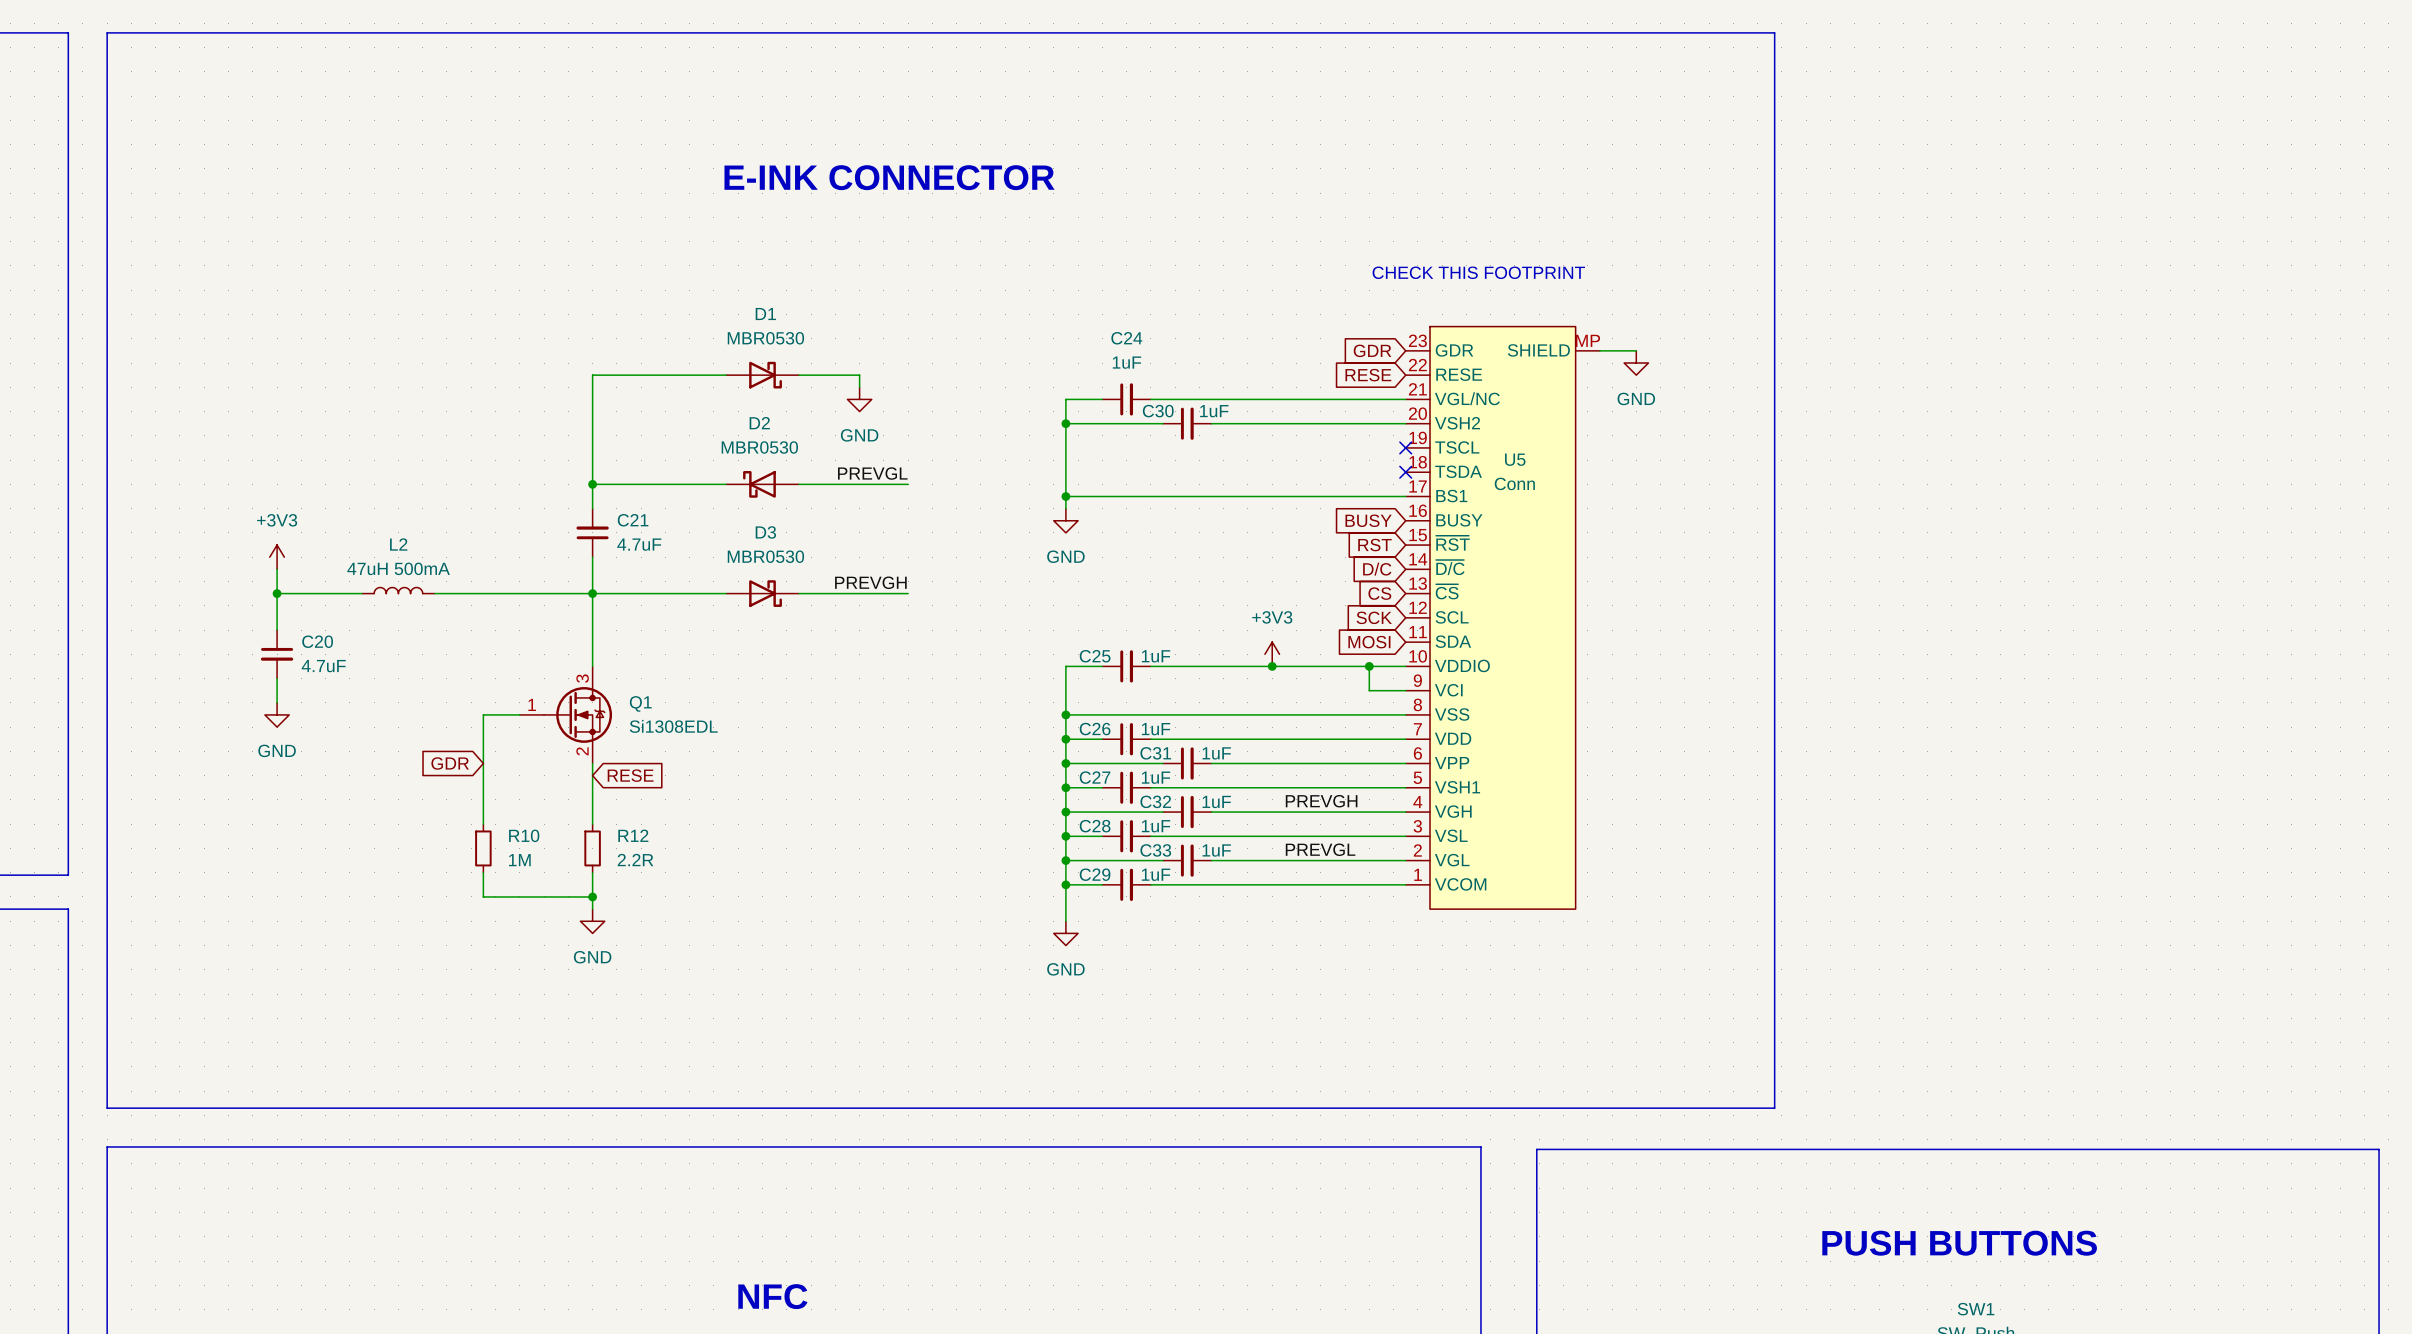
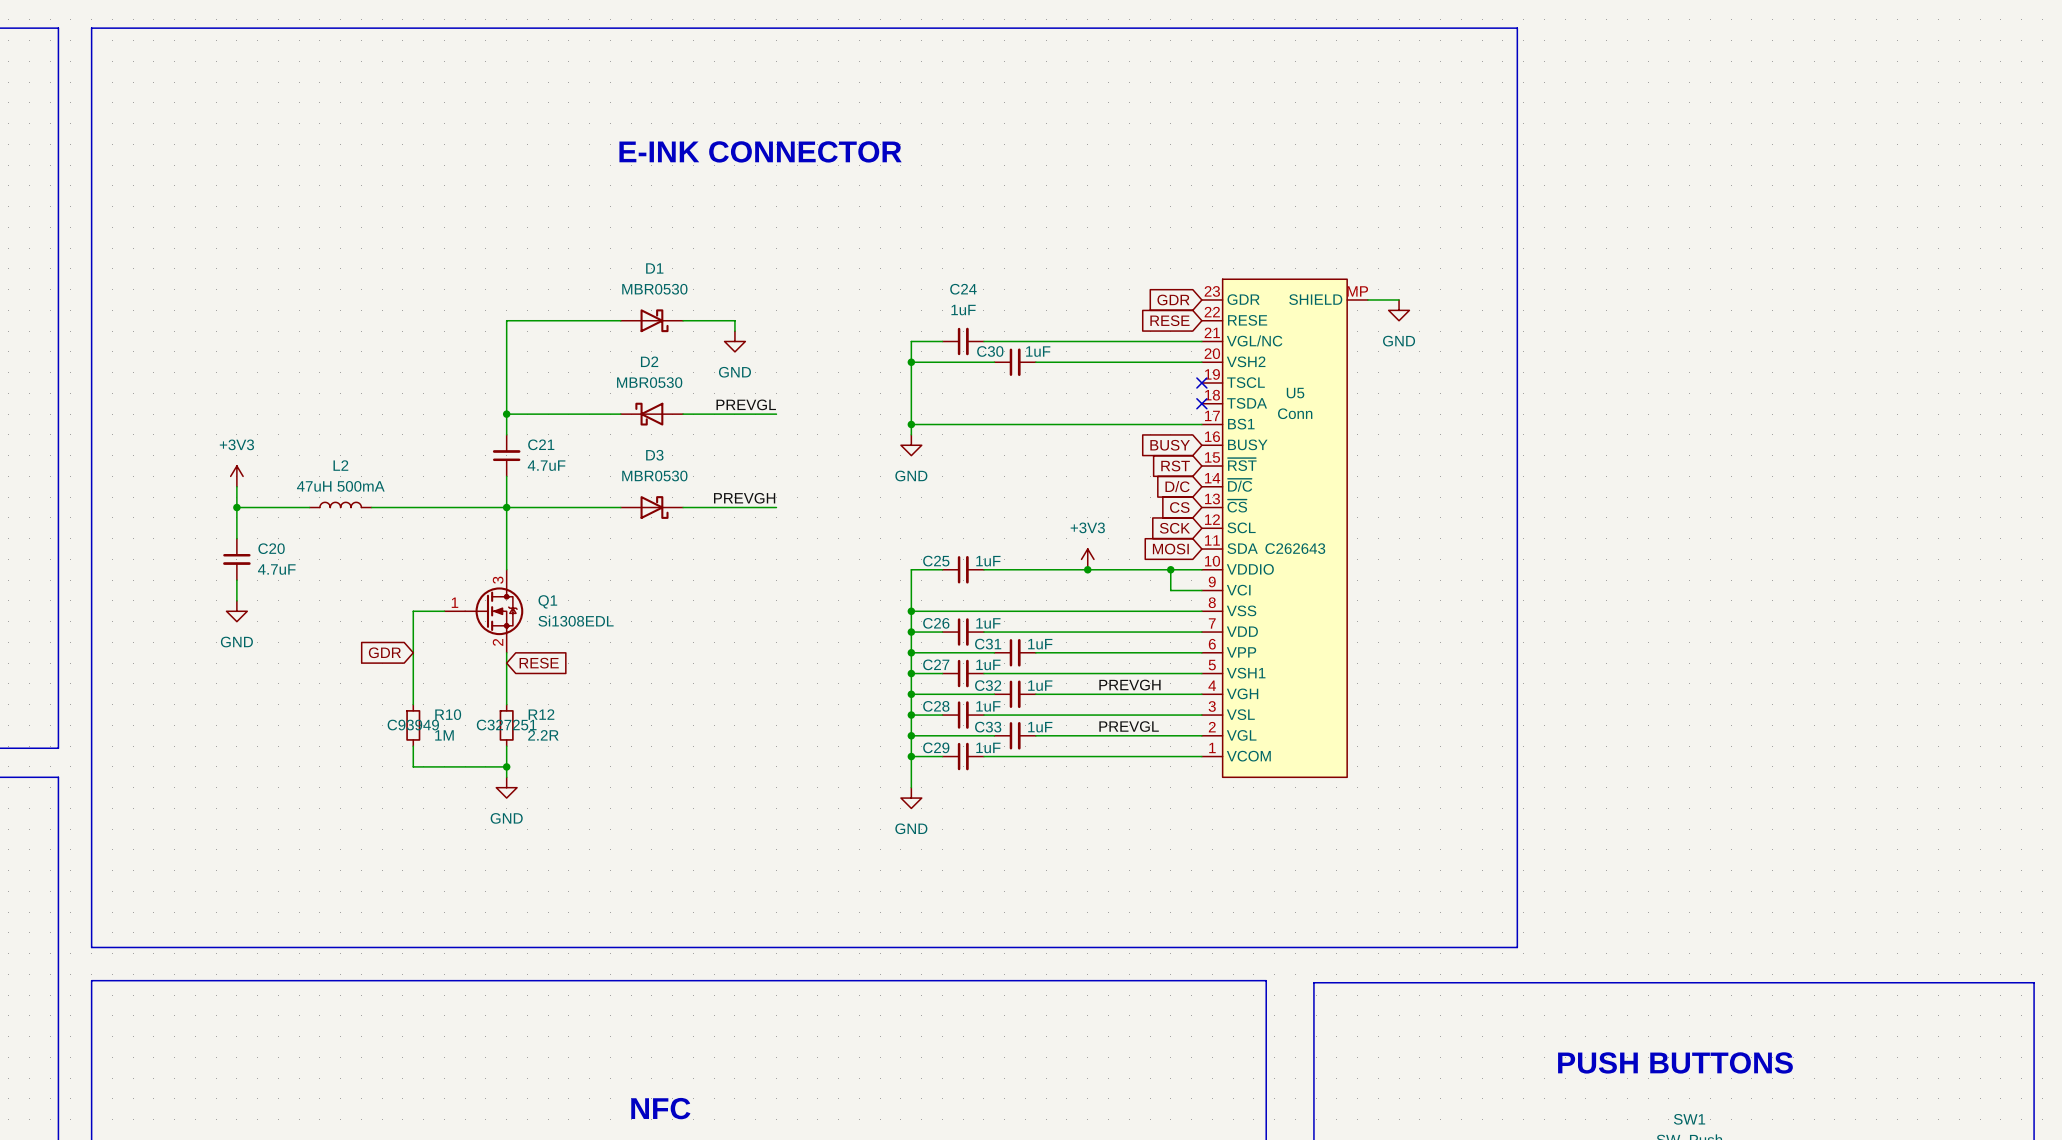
text: CHECK THIS FOOTPRINT (1478, 272) -> none
U5 text: none -> C262643 (1295, 548)
R10 text: none -> C93949 (413, 725)
R12 text: none -> C327251 (506, 725)

